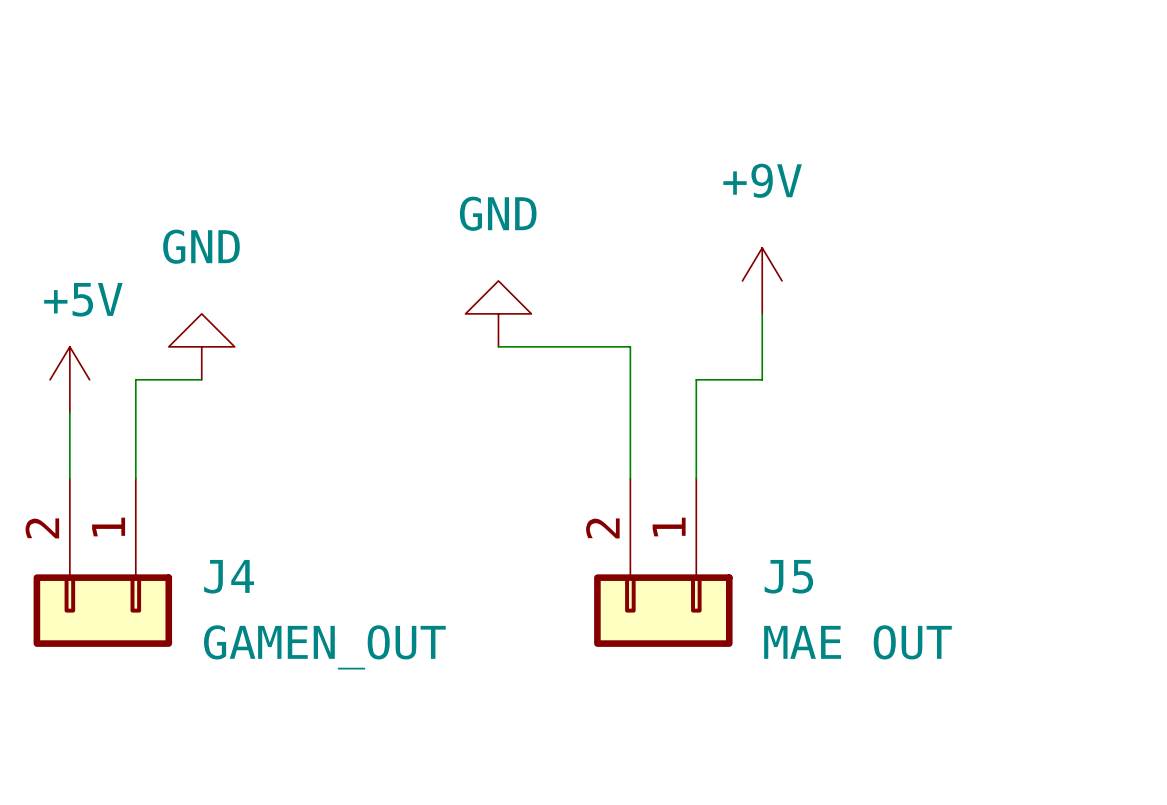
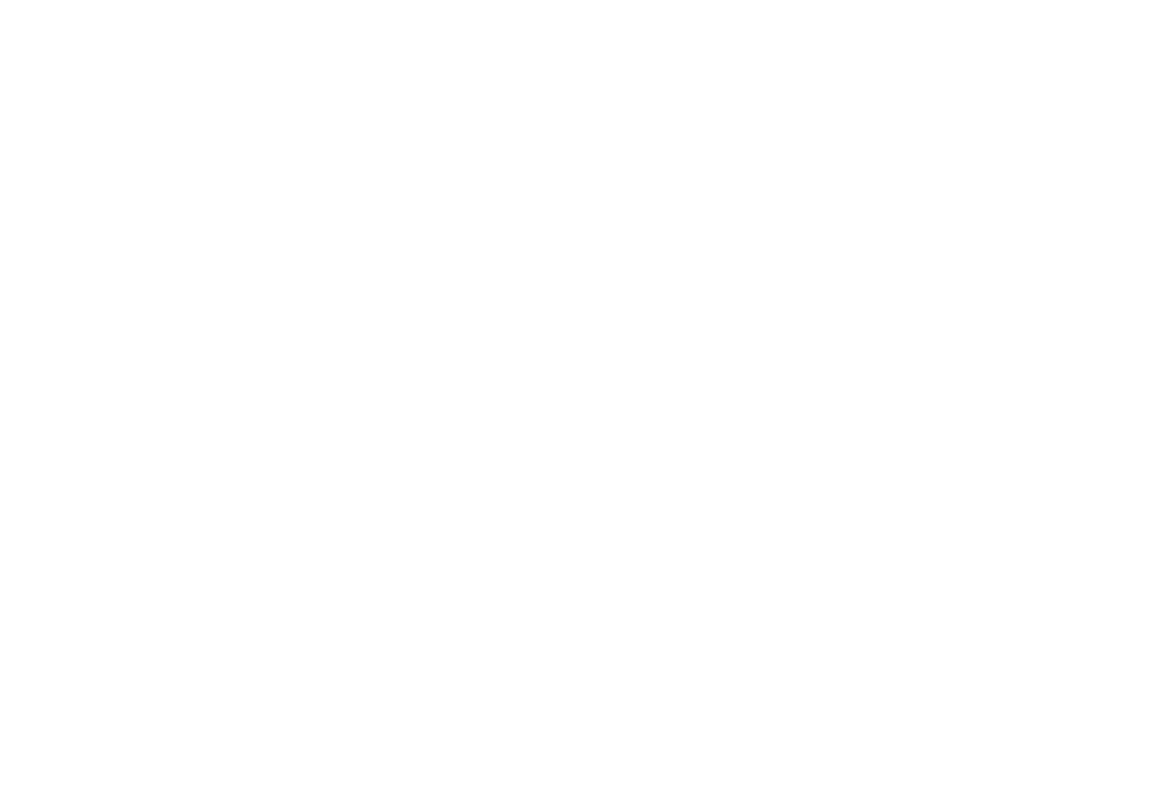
power symbol: +9V (762, 280) -> none
power symbol: GND (498, 313) -> none
wire: (762, 313) (762, 379) (696, 379) (696, 478) -> none
power symbol: GND (201, 346) -> none
wire: (498, 346) (630, 346) (630, 478) -> none
power symbol: +5V (69, 379) -> none
wire: (201, 379) (135, 379) (135, 478) -> none
wire: (69, 412) (69, 478) -> none
J4: GAMEN_OUT (102, 562) -> none
J5: MAE OUT (663, 562) -> none

